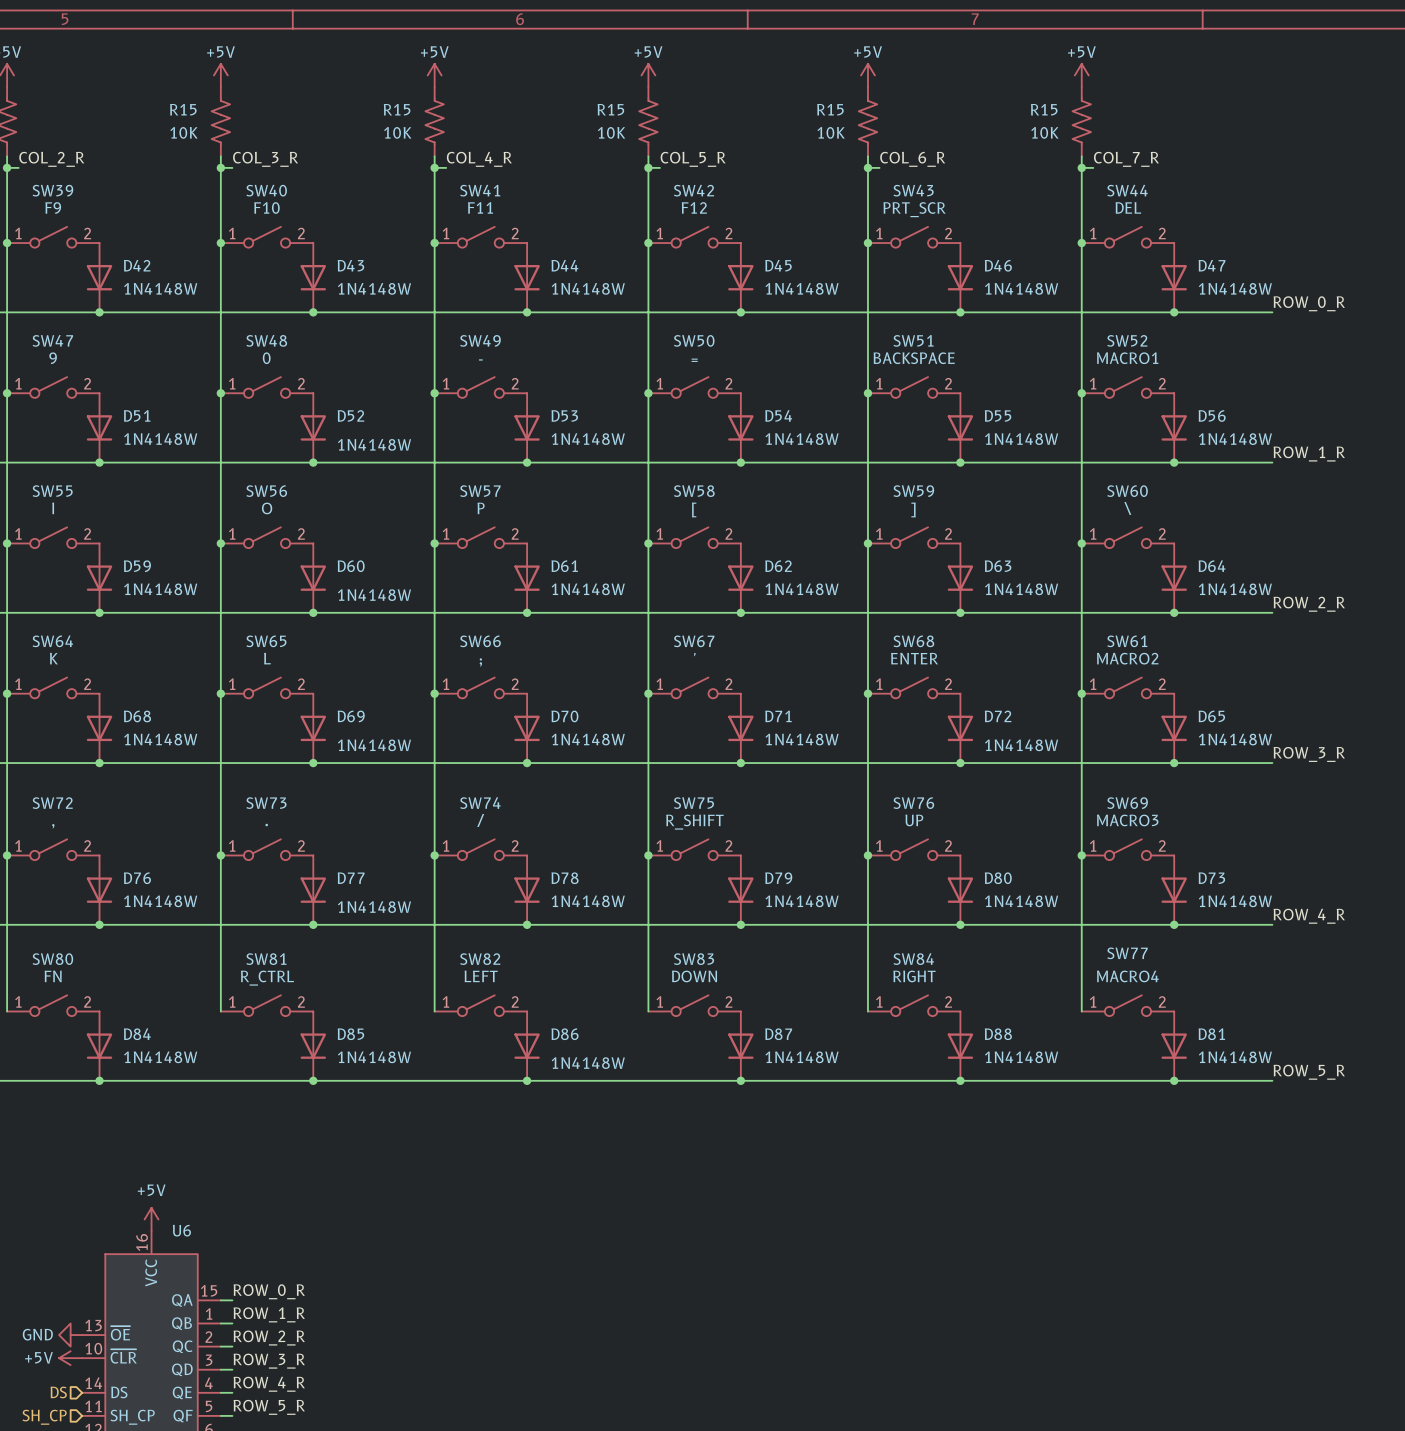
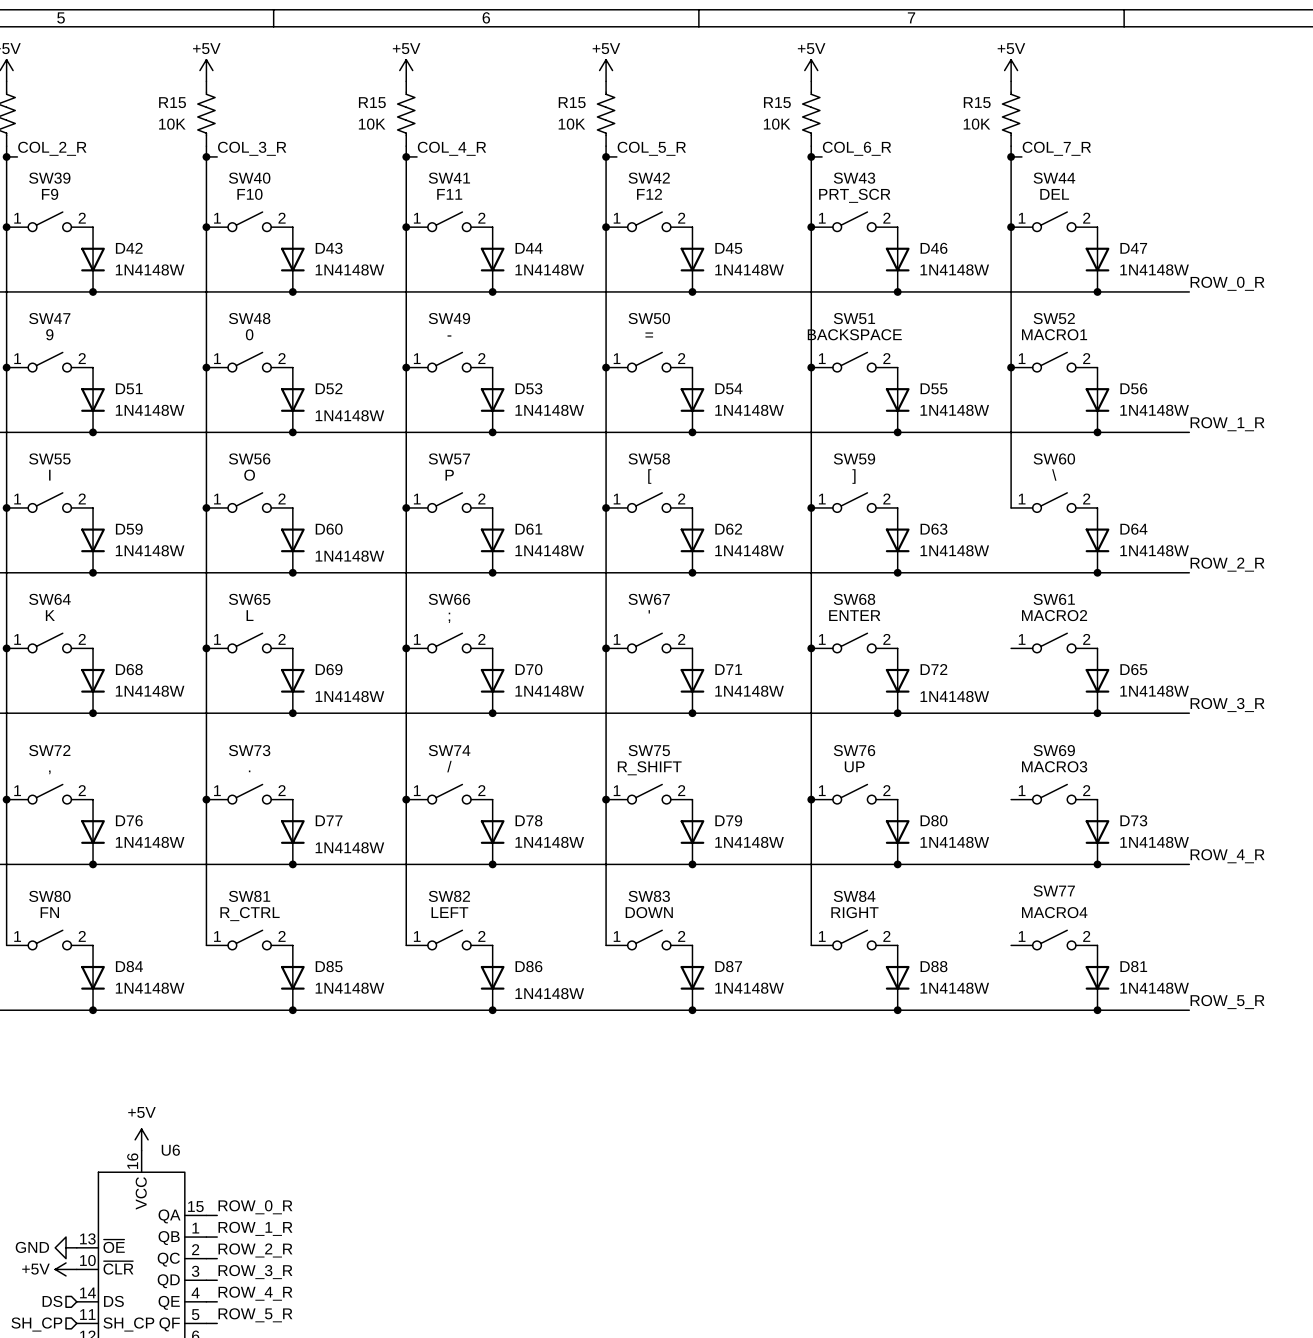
wire: (1081, 543) (1081, 1011) -> none
junction: (1081, 543) -> none
junction: (1081, 693) -> none
junction: (1081, 855) -> none

